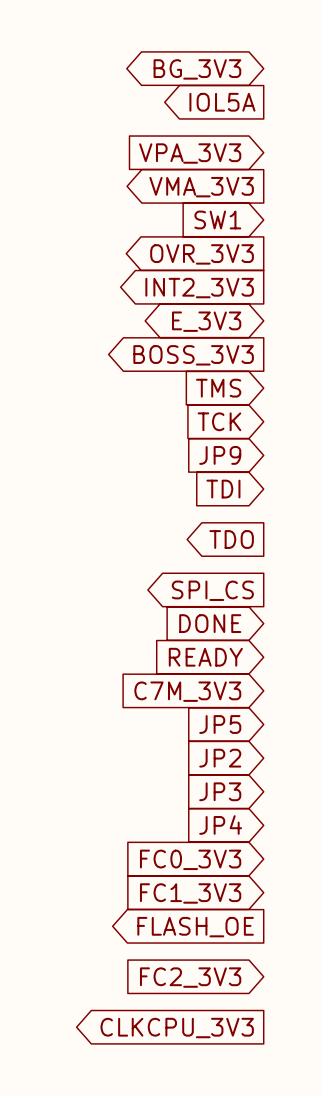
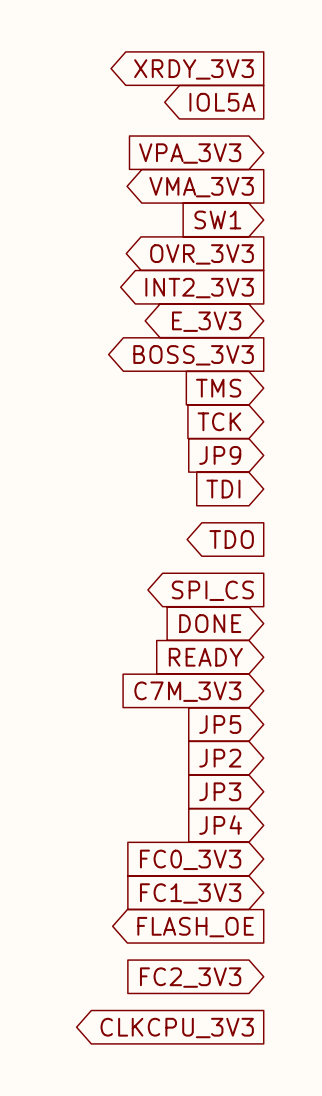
global label shape: bidirectional (197, 69) -> output (194, 69)
global label: BG_3V3 (197, 69) -> XRDY_3V3 (194, 69)

